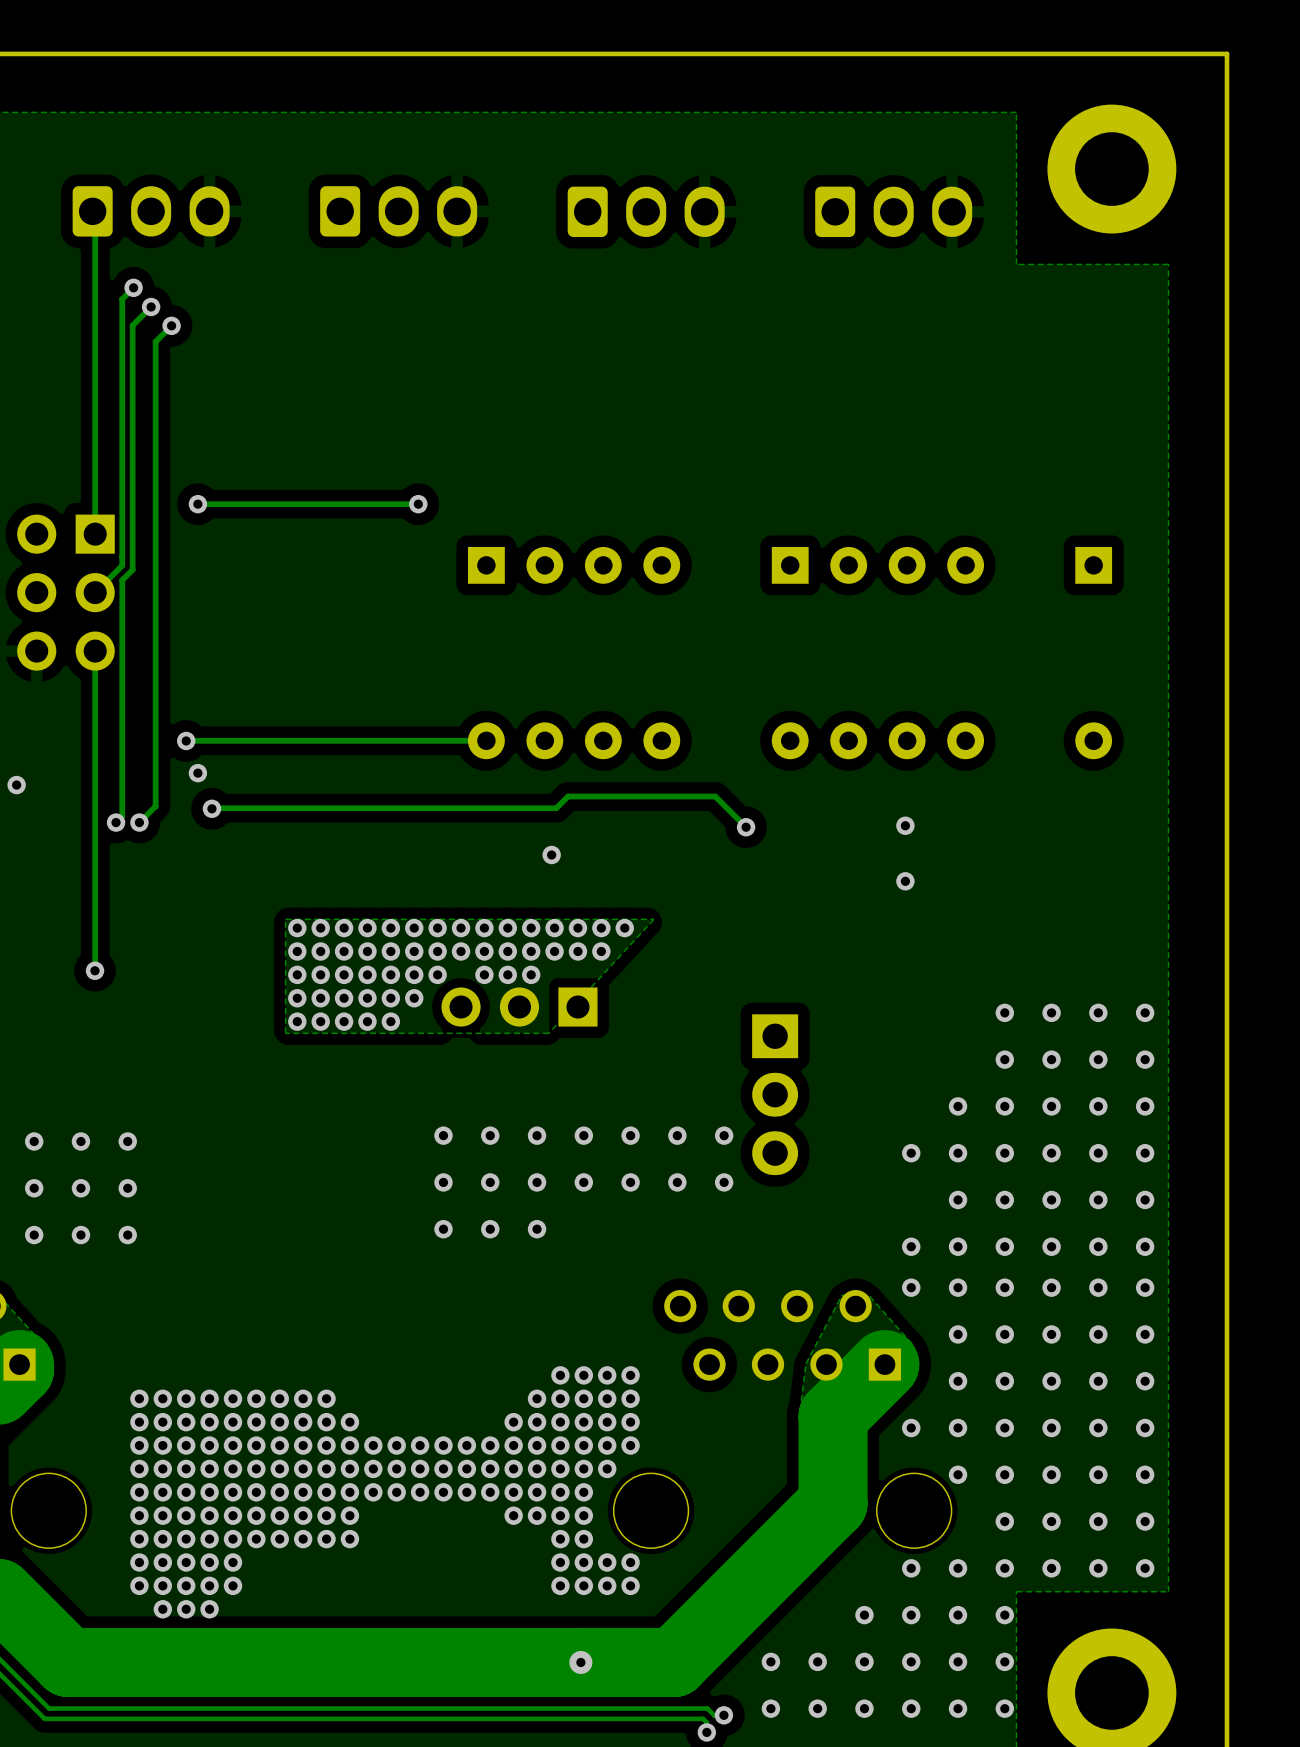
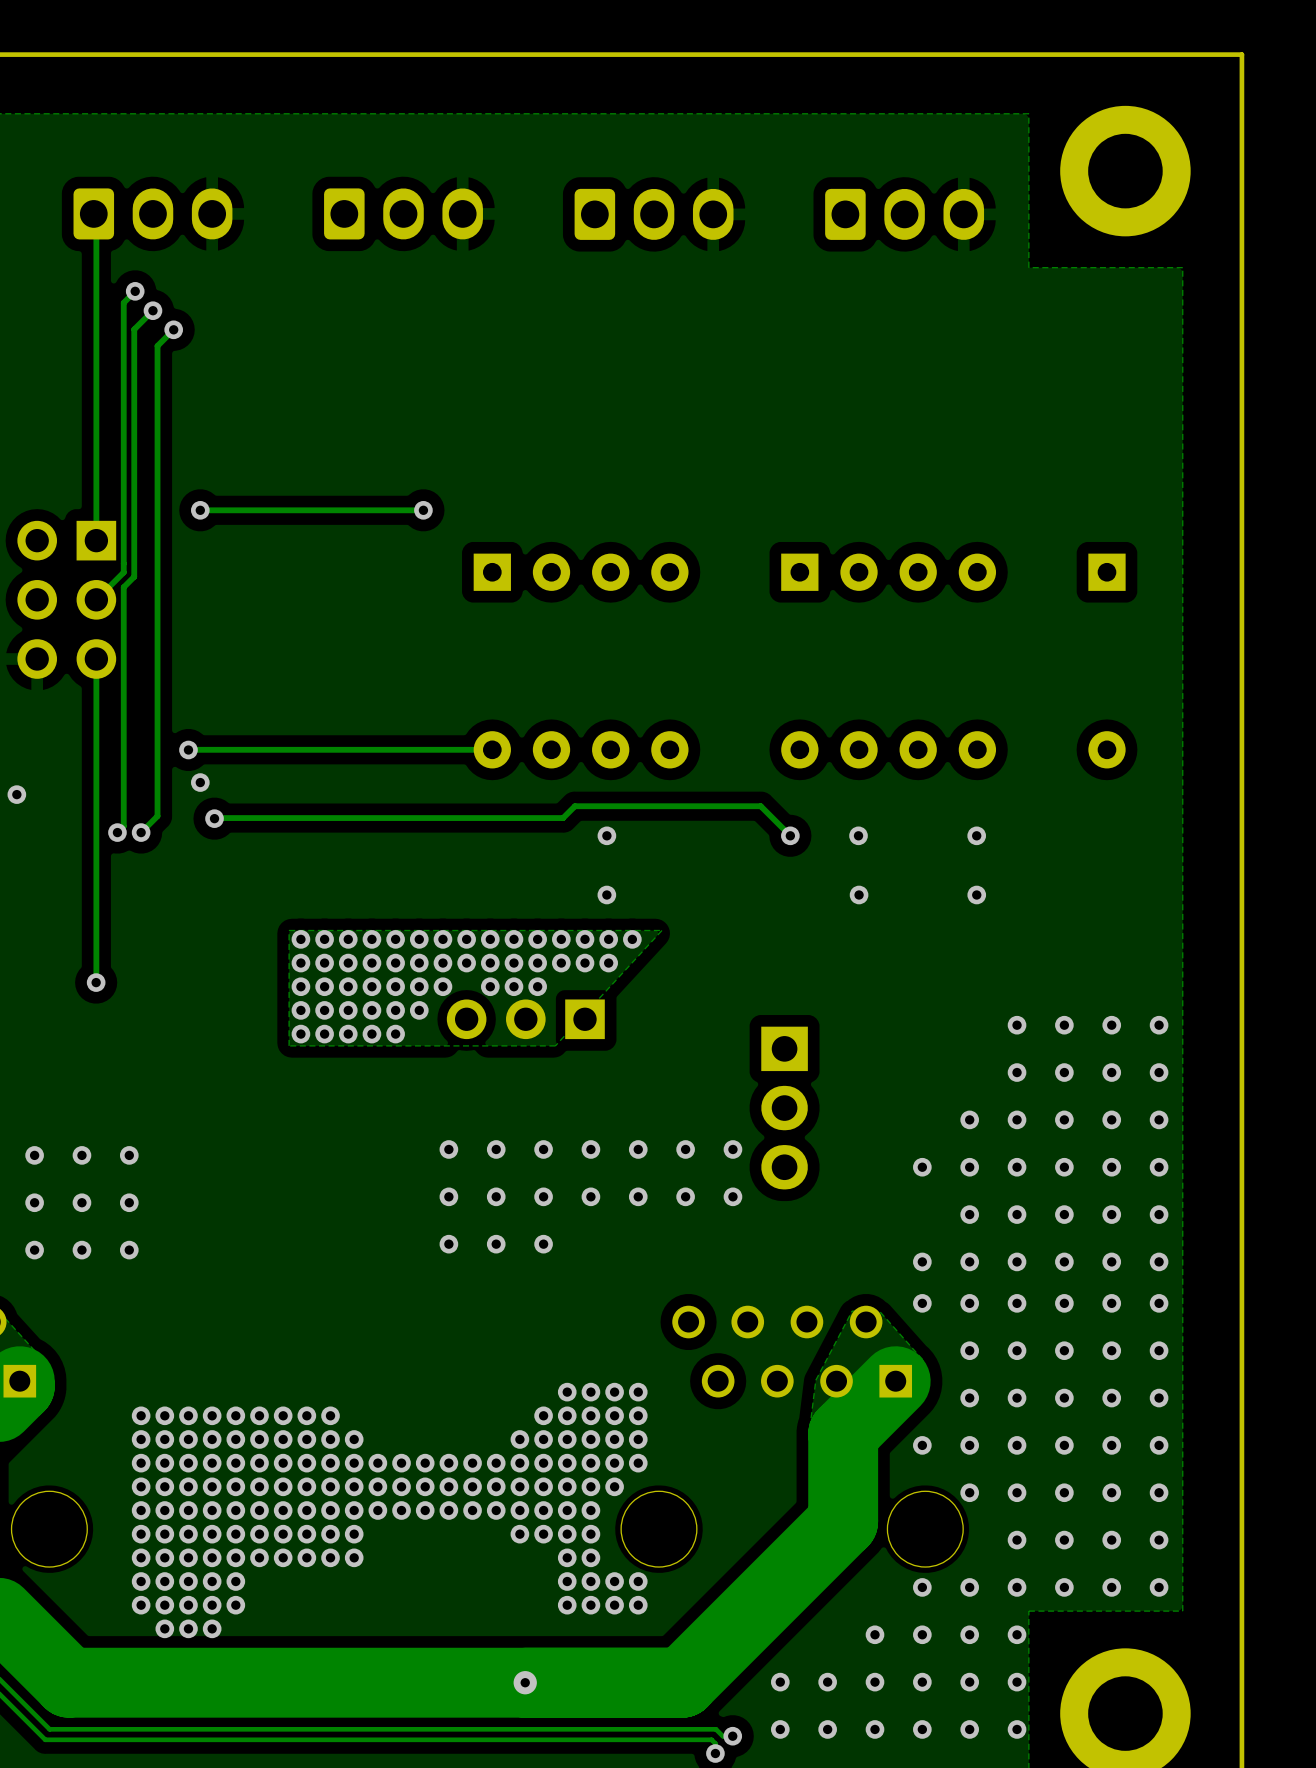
track: (715, 796) (746, 827) -> (724, 806) (760, 806) (790, 835)
via: none -> (606, 835)
via: none -> (858, 835)
via: (905, 825) -> none
via: none -> (976, 835)
via position: (746, 827) -> (790, 835)
via: (551, 855) -> none
via: (905, 881) -> none
via: none -> (606, 894)
via: none -> (859, 894)
via: none -> (976, 894)
via position: (580, 1662) -> (525, 1682)

